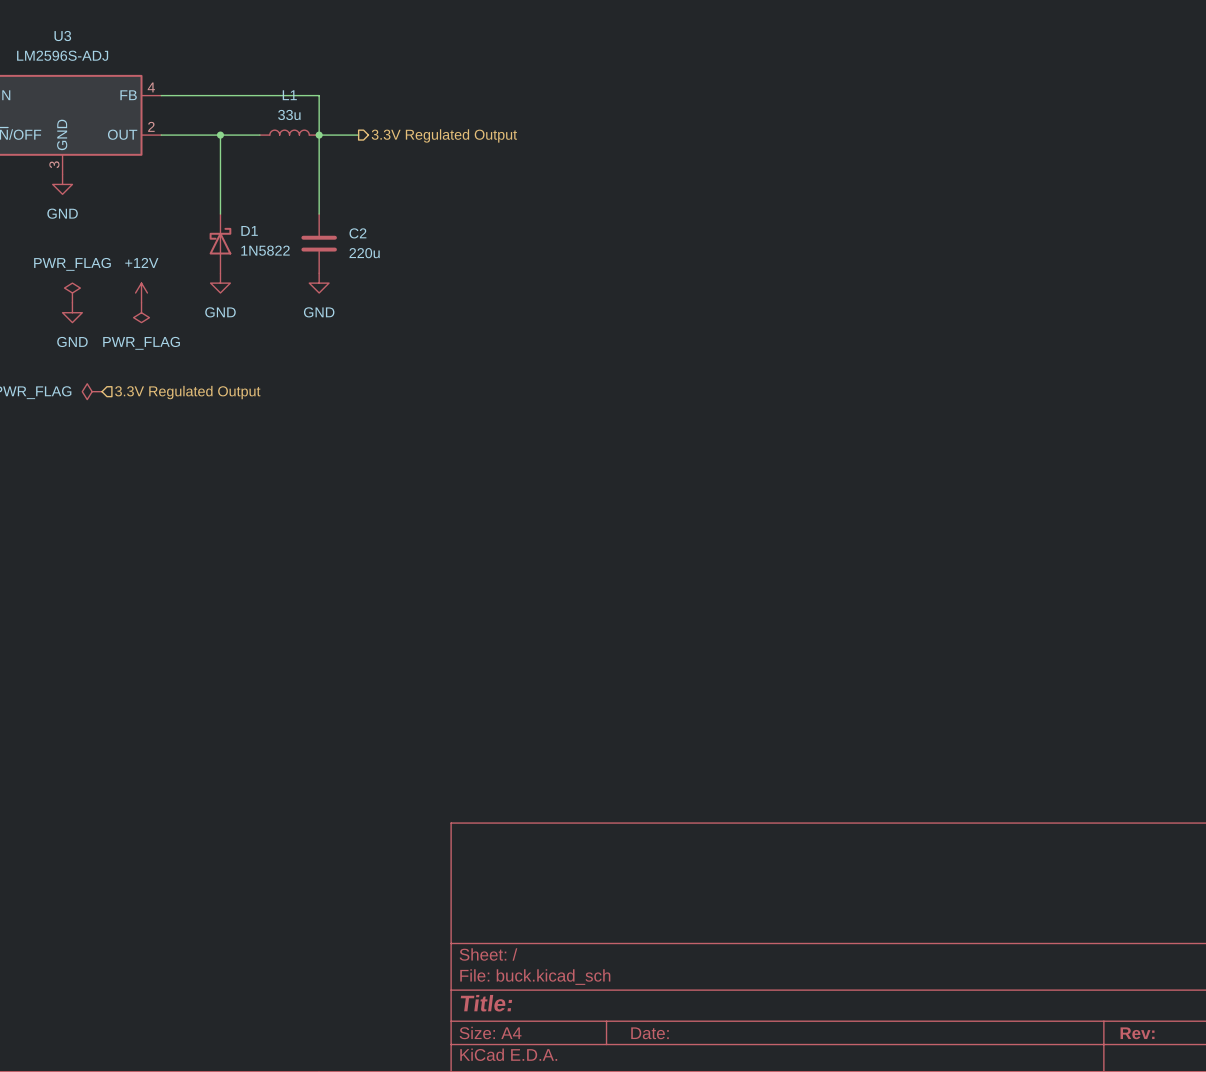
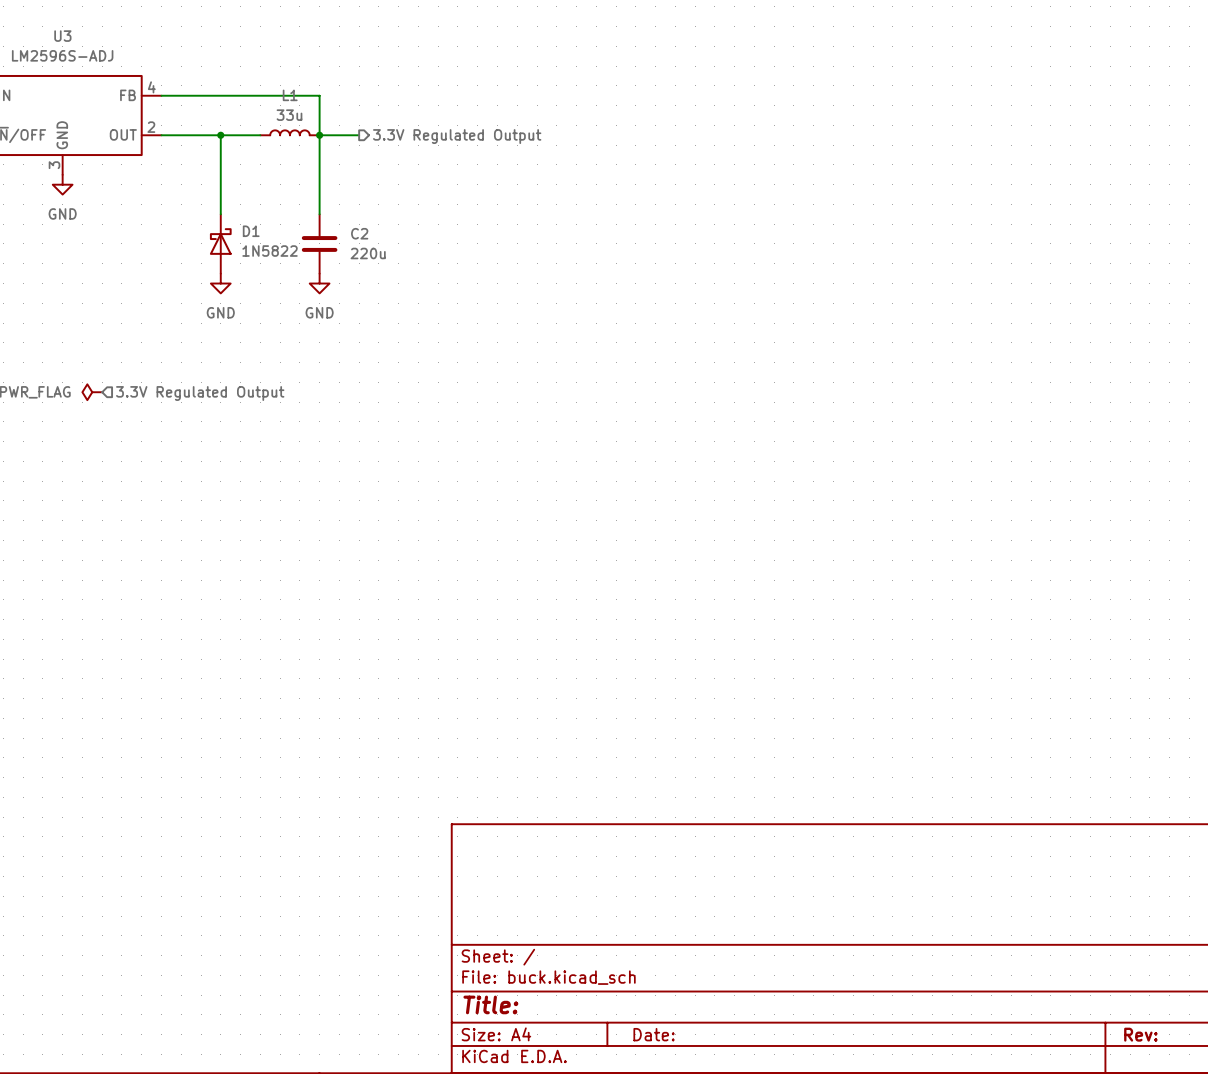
power symbol: PWR_FLAG (72, 292) -> none
power symbol: +12V (141, 292) -> none
power symbol: GND (72, 312) -> none
power symbol: PWR_FLAG (141, 312) -> none

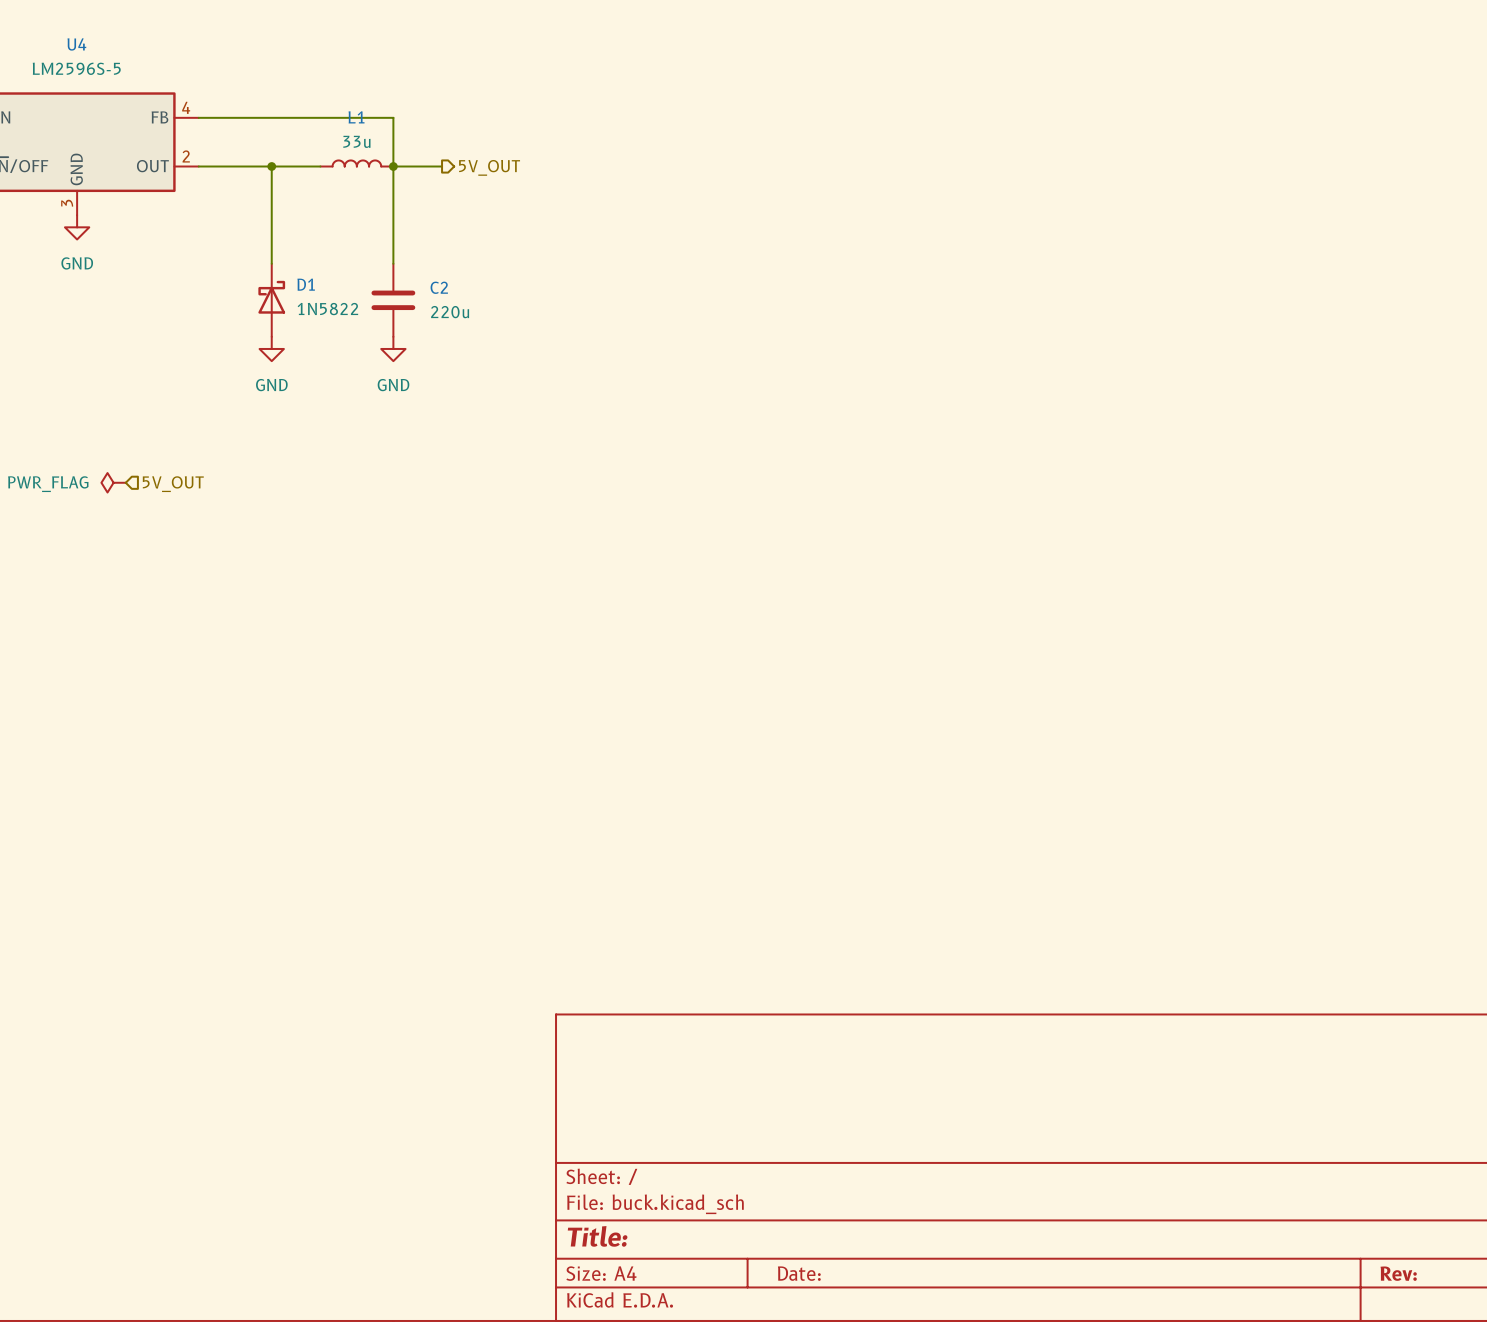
U3 name: U3 (62, 36) -> U4 (76, 44)
U3 value: LM2596S-ADJ (62, 55) -> LM2596S-5 (76, 68)
hierarchical label: 3.3V Regulated Output (457, 136) -> 5V_OUT (489, 167)
hierarchical label: 3.3V Regulated Output (200, 393) -> 5V_OUT (173, 484)

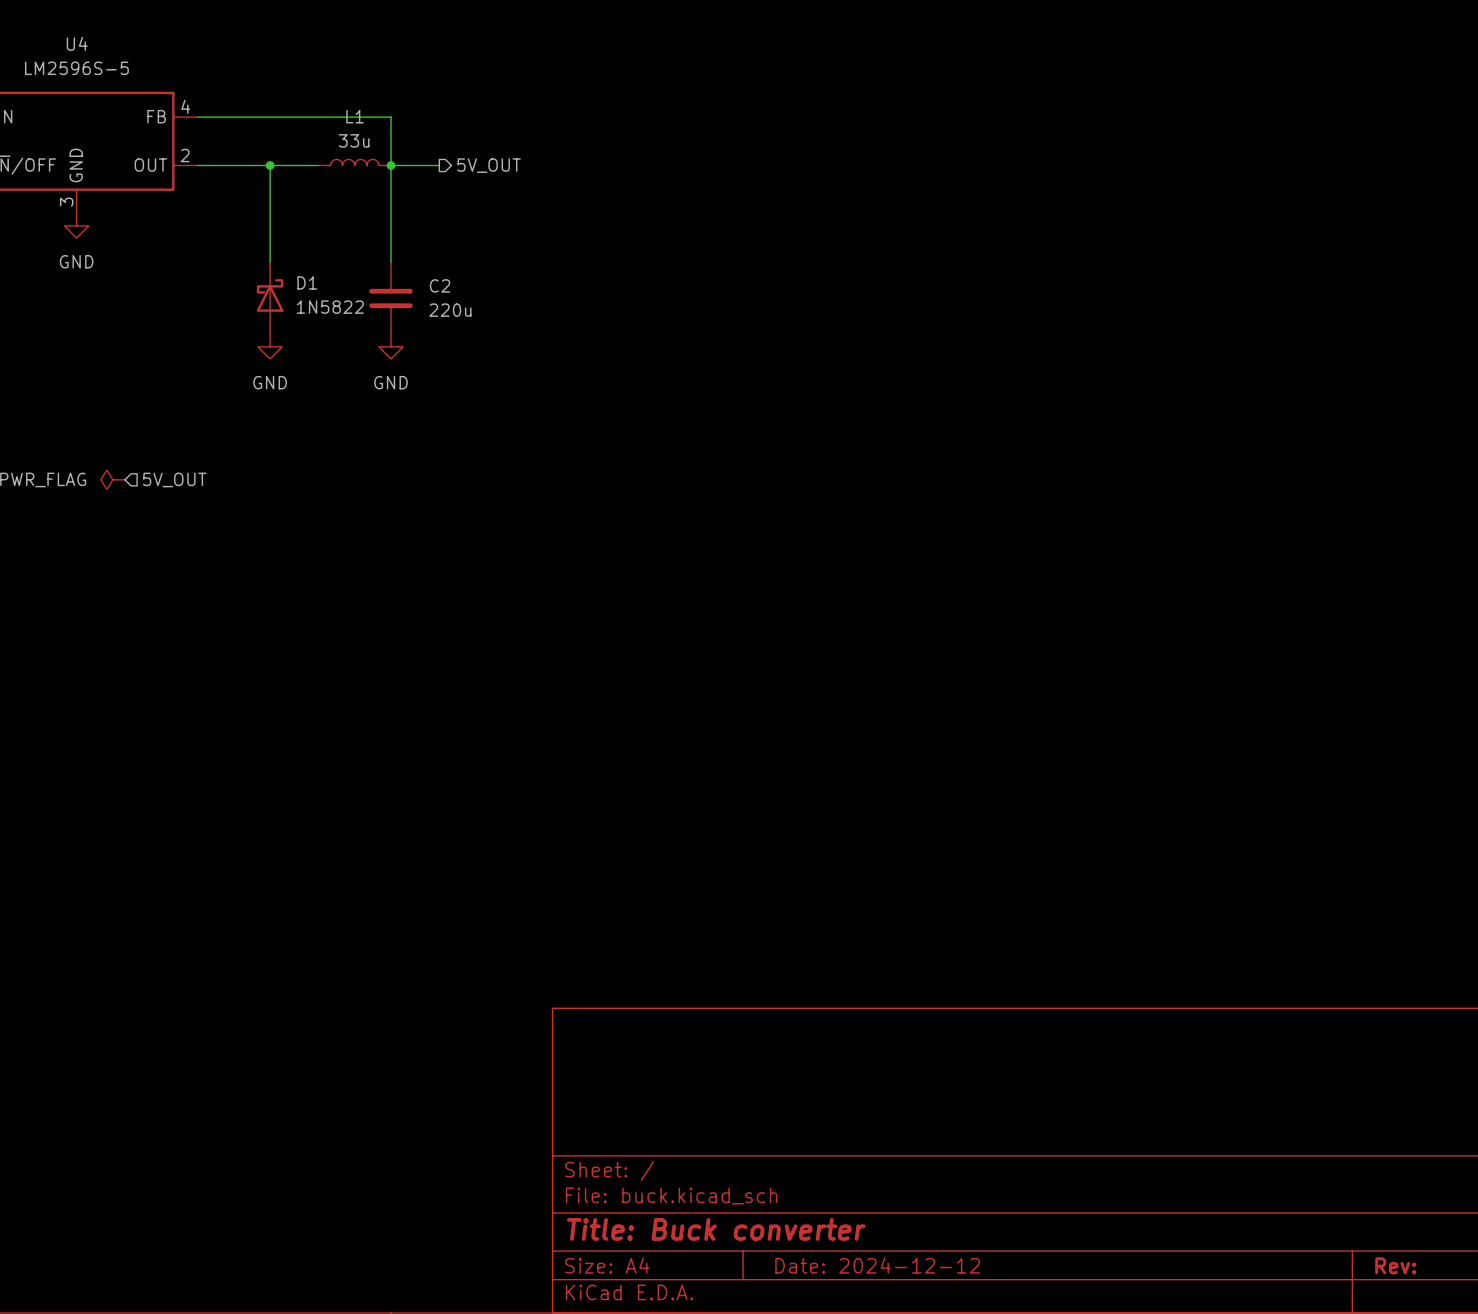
title block: Title: (597, 1236) -> Title: Buck converter (716, 1229)
title block: Date: (799, 1273) -> Date: 2024-12-12 (877, 1265)

